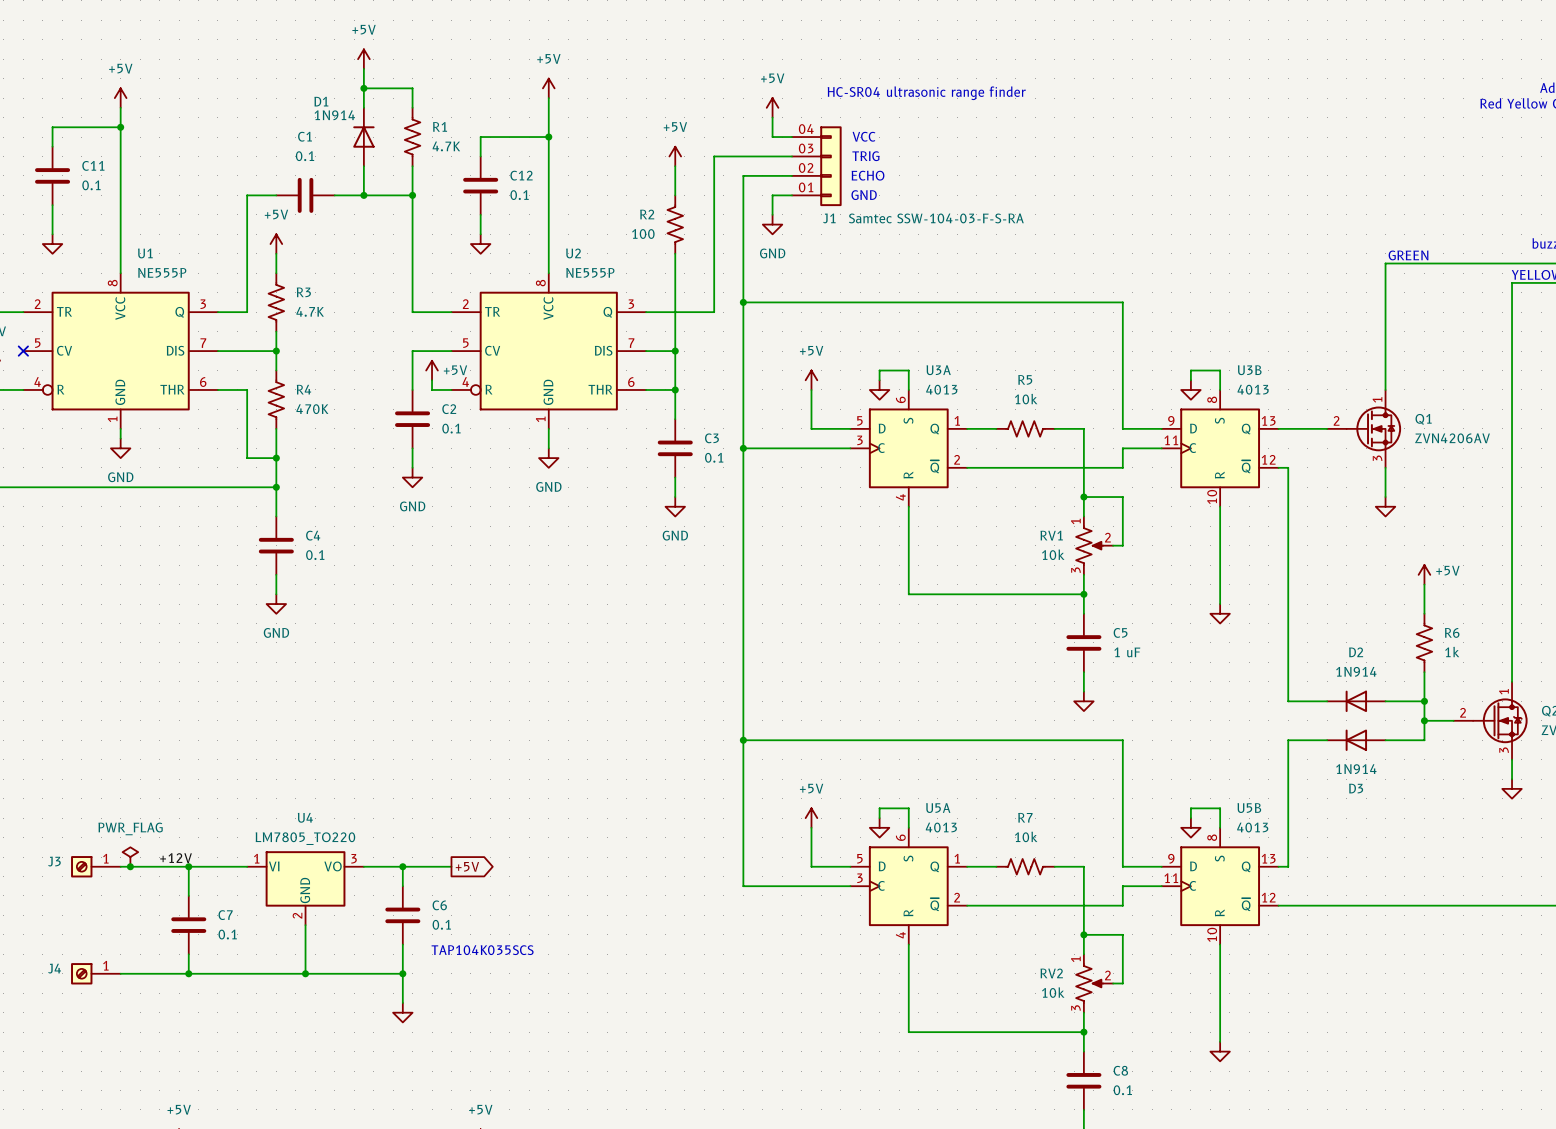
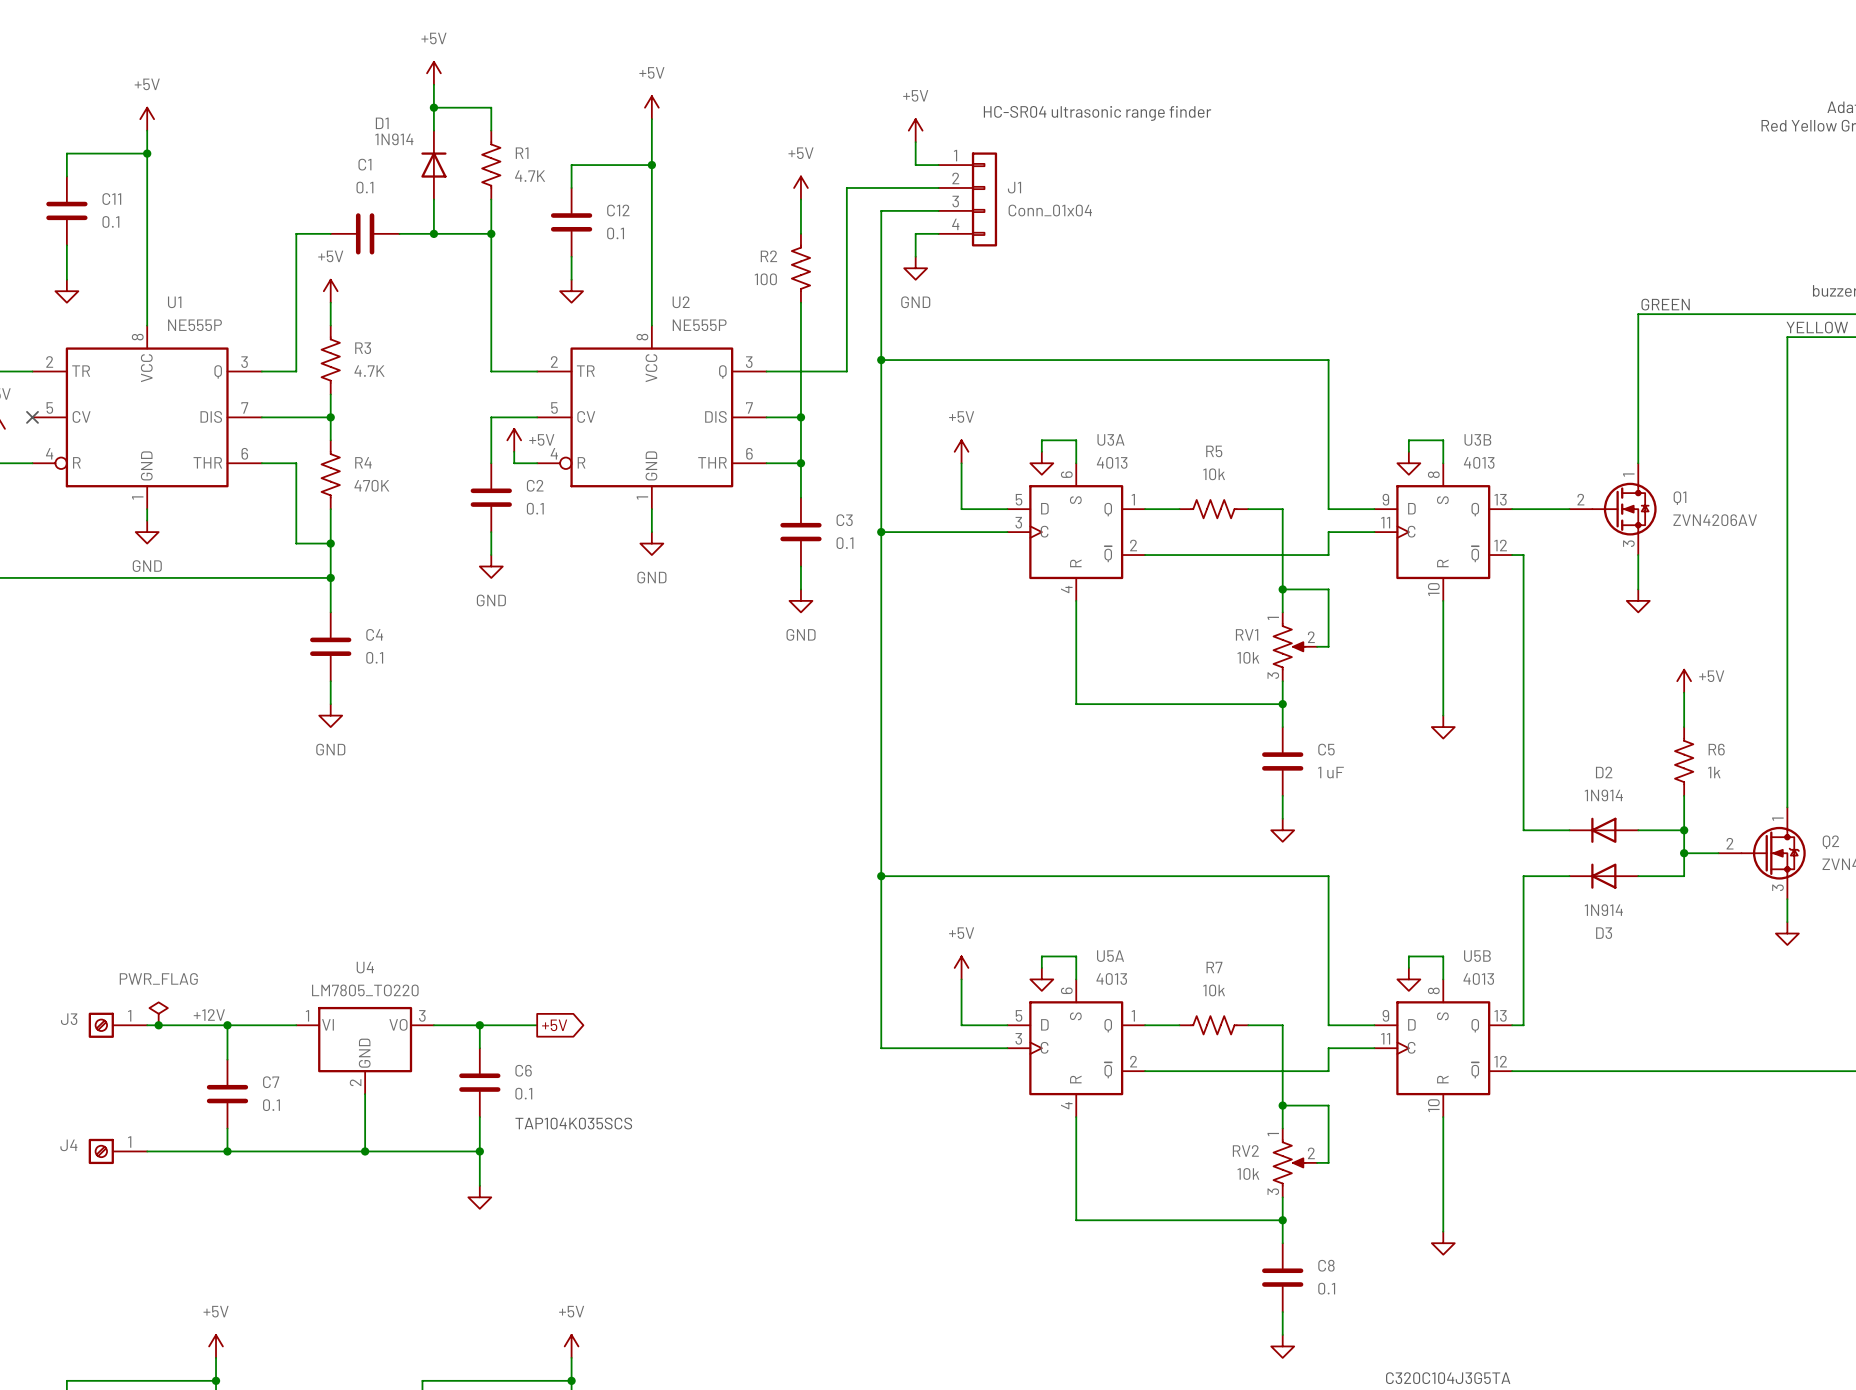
J1 pin number: 04 (806, 129) -> 1 (955, 155)
text: VCC (863, 136) -> none
J1 pin number: 03 (806, 148) -> 2 (955, 178)
text: TRIG (865, 156) -> none
J1 pin number: 02 (806, 167) -> 3 (955, 201)
text: ECHO (868, 175) -> none
J1 pin number: 01 (806, 187) -> 4 (955, 224)
text: GND (864, 195) -> none
J1 name position: J1 (829, 218) -> J1 (1014, 187)
J1 value: Samtec SSW-104-03-F-S-RA (936, 218) -> Conn_01x04 (1050, 210)

